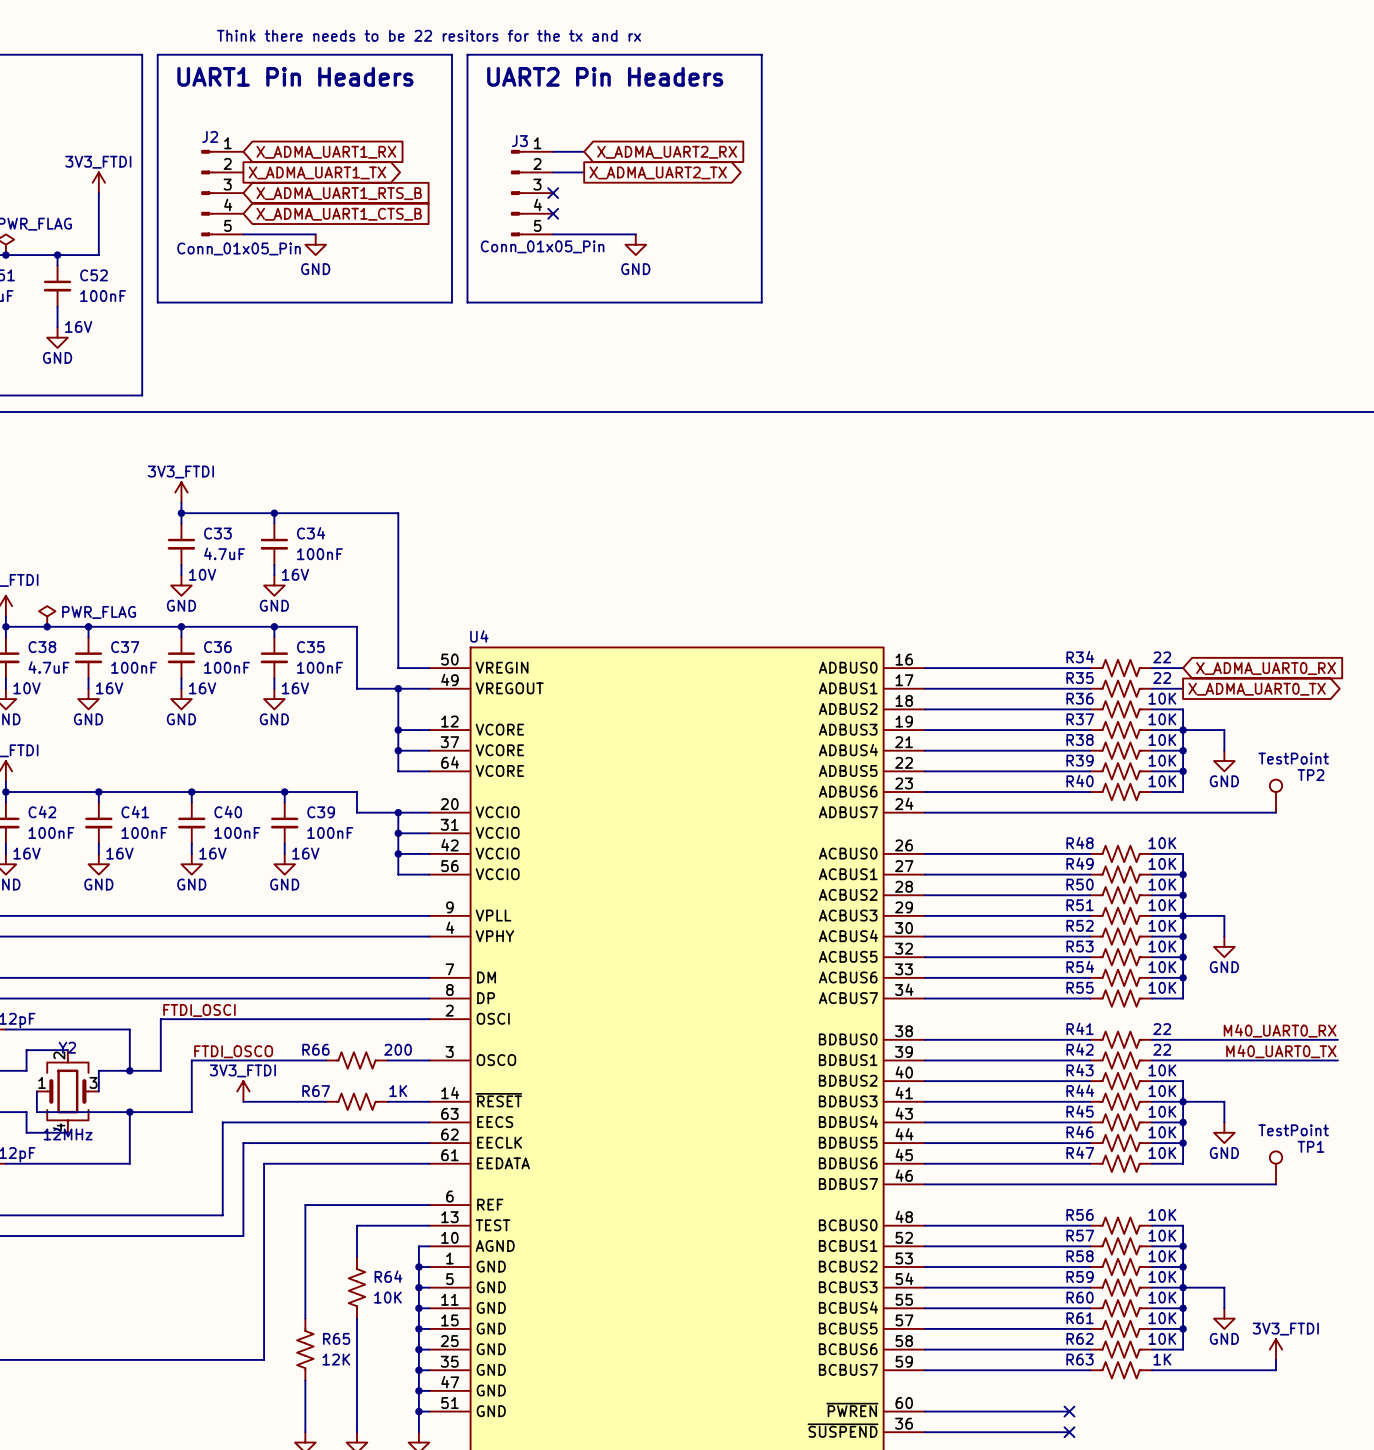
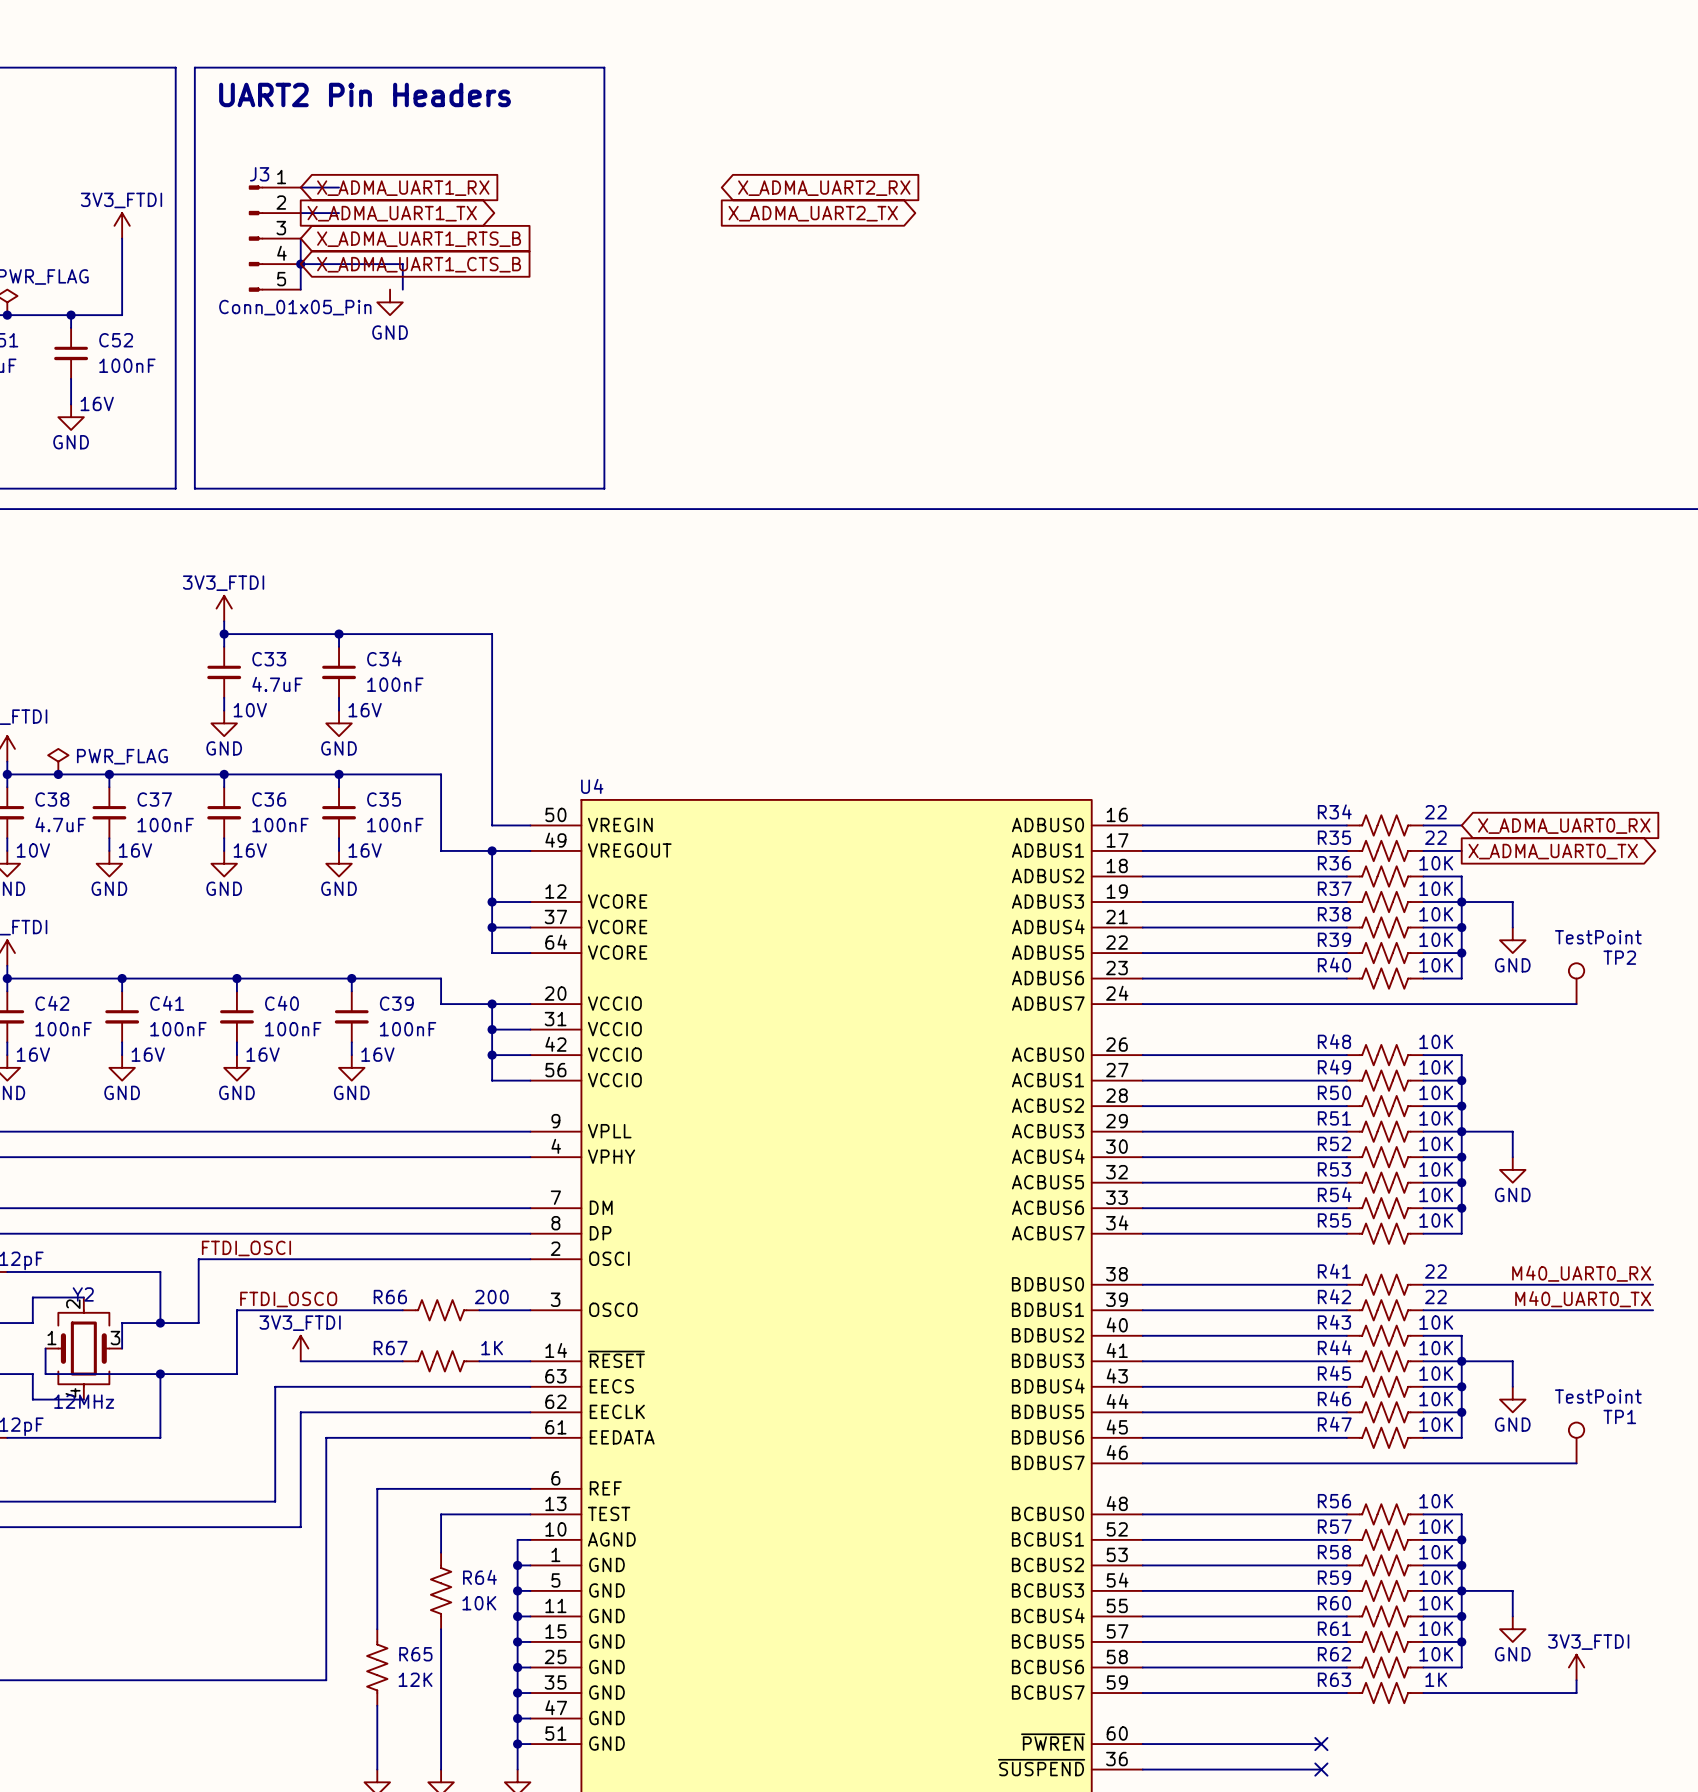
text: Think there needs to be 22 resitors for the tx and rx (429, 35) -> none
line: (451, 54) (451, 302) (157, 302) -> (604, 67) (604, 488) (194, 488) (194, 373)
line: (467, 54) (467, 302) (761, 302) (761, 54) (489, 54) -> (577, 67) (558, 67)
text: UART1 Pin Headers (295, 76) -> UART2 Pin Headers (365, 94)
text: UART2 Pin Headers (605, 76) -> none
J2 name: J2 (210, 136) -> J3 (259, 174)
wire: none -> (300, 187) (339, 187)
wire: (553, 151) (584, 151) -> none
wire: none -> (300, 213) (339, 213)
wire: (553, 172) (584, 172) -> none
J3: Conn_01x05_Pin (532, 193) -> none
no-connect mark: (553, 193) -> none
wire: none -> (300, 264) (402, 264) (402, 289)
junction: none -> (300, 264)
no-connect mark: (553, 213) -> none
wire: (243, 234) (315, 234) -> (300, 289) (300, 238)
wire: (553, 234) (635, 234) -> none
power symbol: GND (635, 244) -> none

